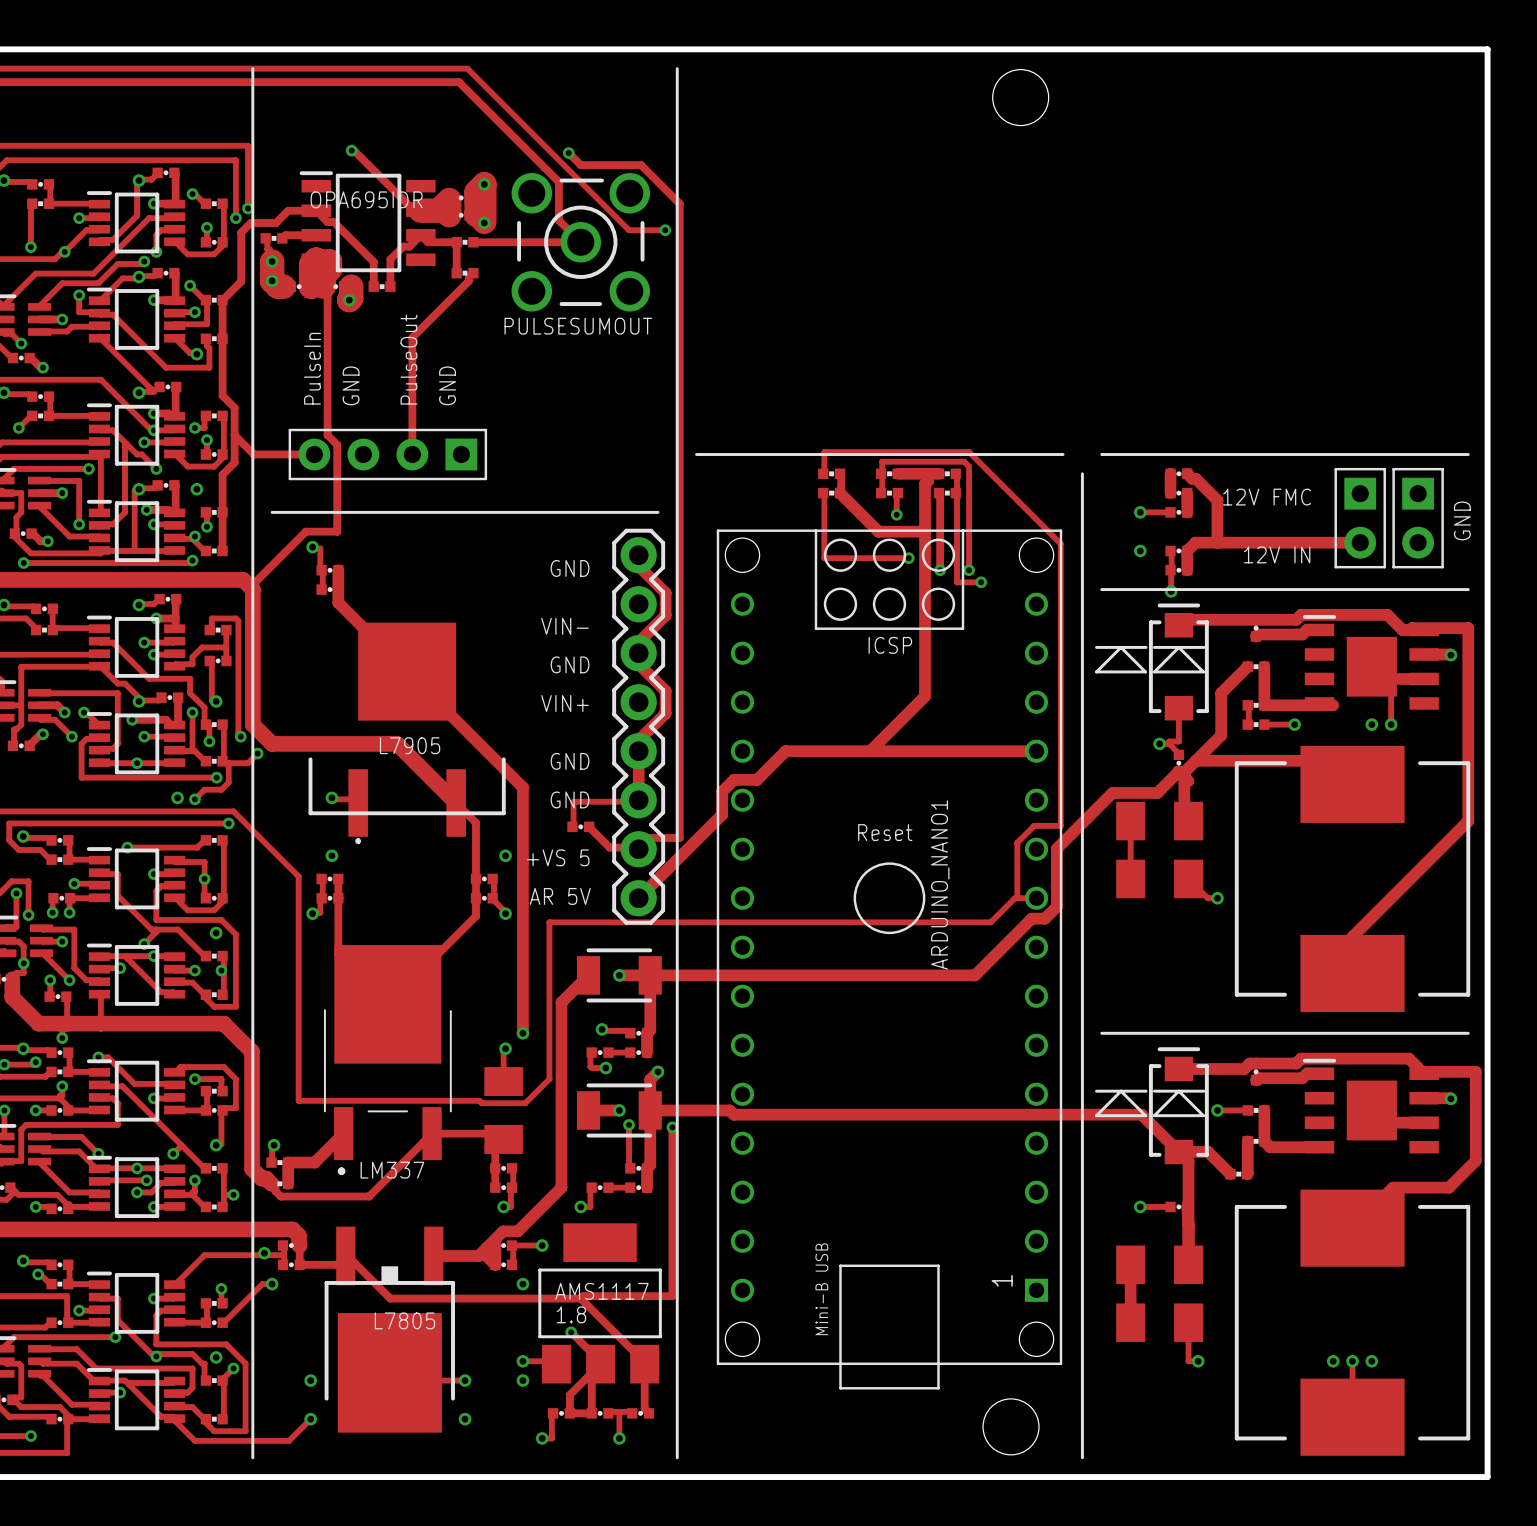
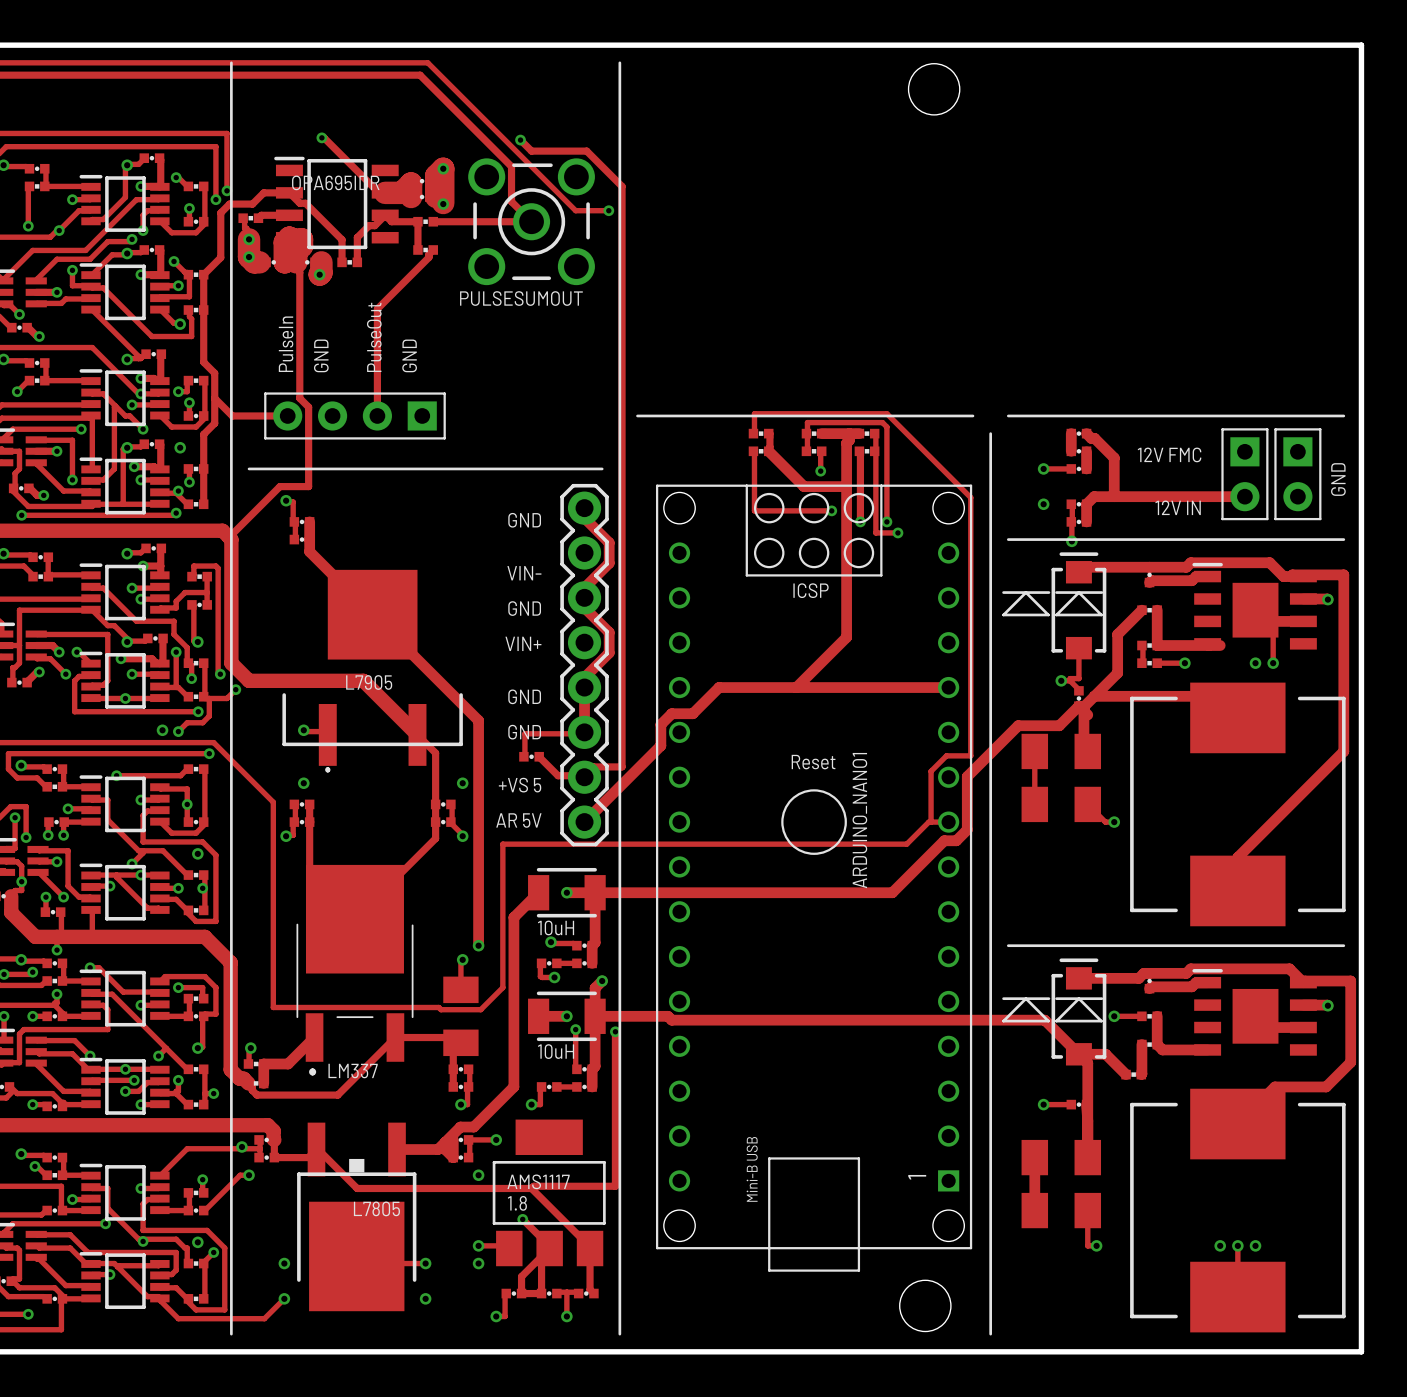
part value: none -> 10uH (556, 927)
part value: none -> 10uH (556, 1051)

